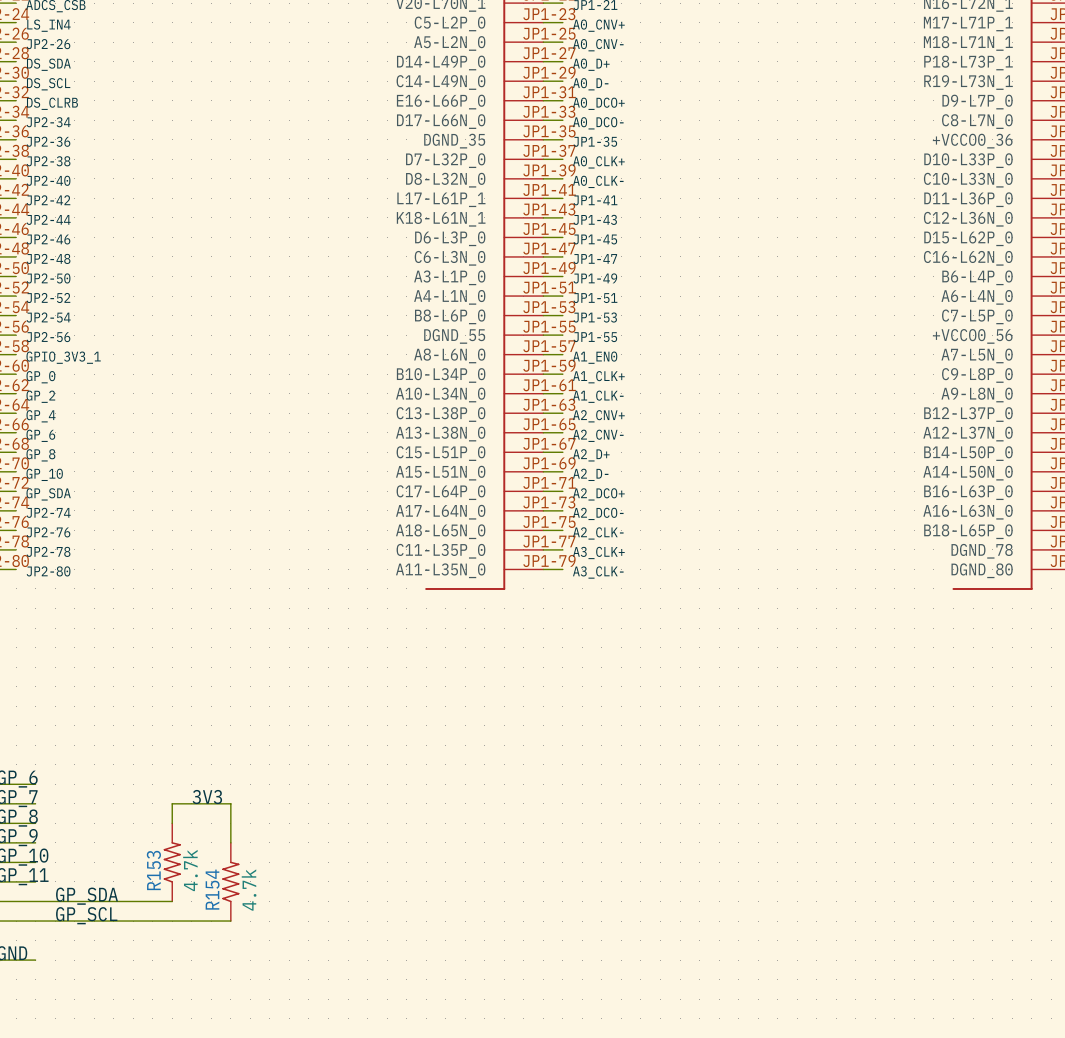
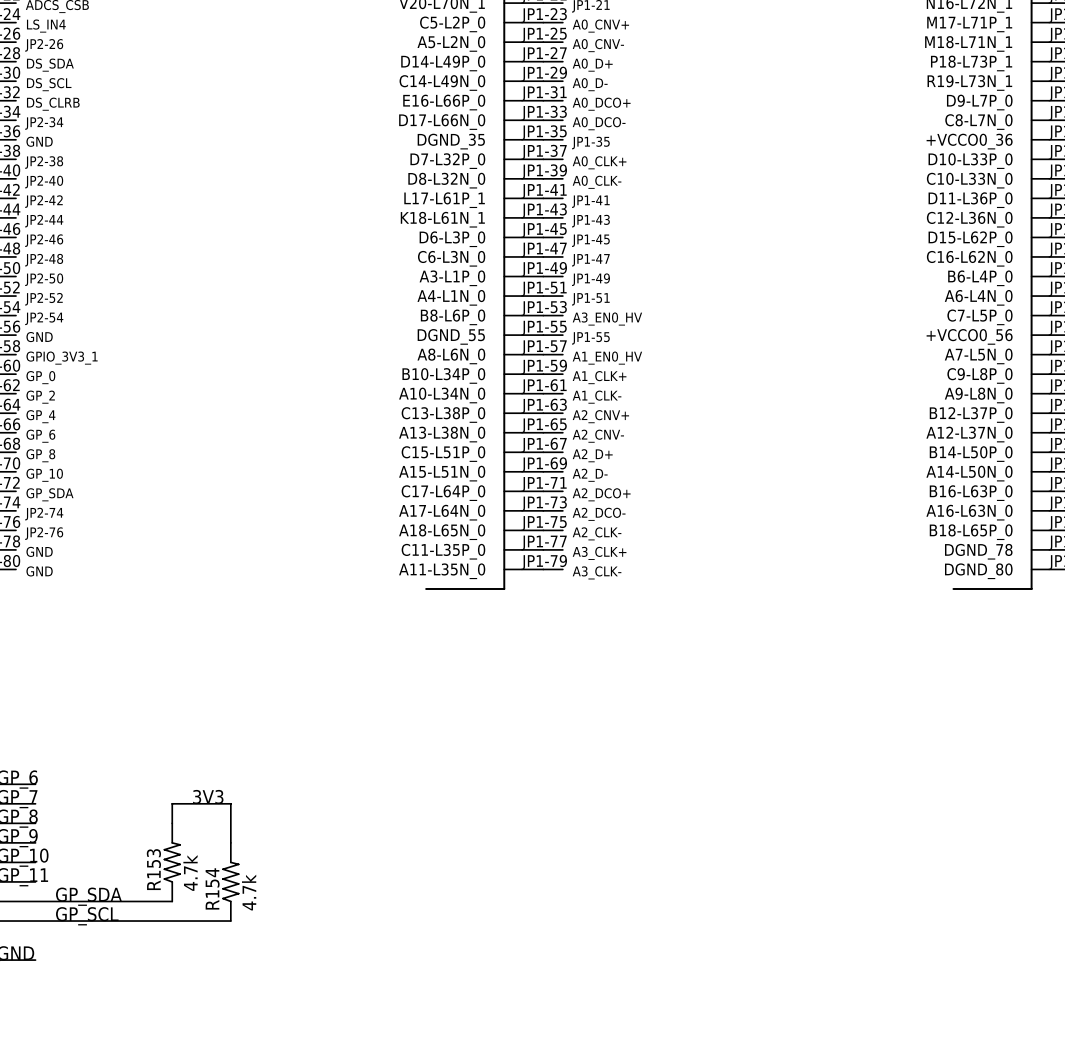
label: JP2-36 (48, 141) -> GND (39, 141)
label: JP1-53 (595, 317) -> A3_EN0_HV (607, 319)
label: JP2-56 (48, 337) -> GND (39, 337)
label: A1_EN0 (595, 357) -> A1_EN0_HV (607, 358)
label: JP2-78 (48, 551) -> GND (39, 551)
label: JP2-80 (48, 571) -> GND (39, 571)

